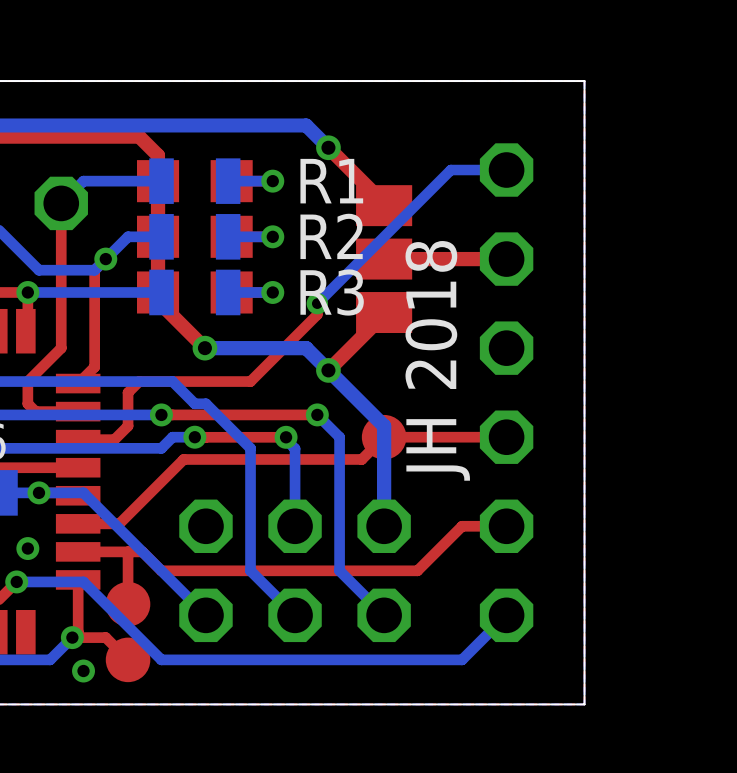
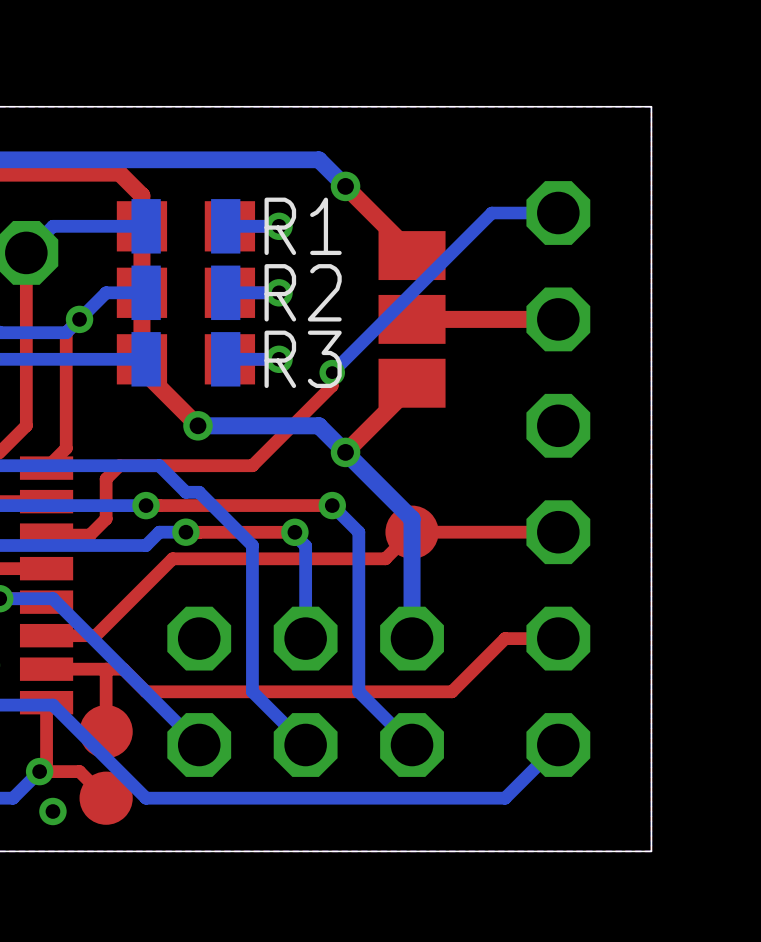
R1 name position: R1 (331, 181) -> R1 (303, 226)
R2 name position: R2 (331, 236) -> R2 (303, 292)
R3 name position: R3 (332, 292) -> R3 (303, 359)
text: JH 2018 (437, 360) -> none

